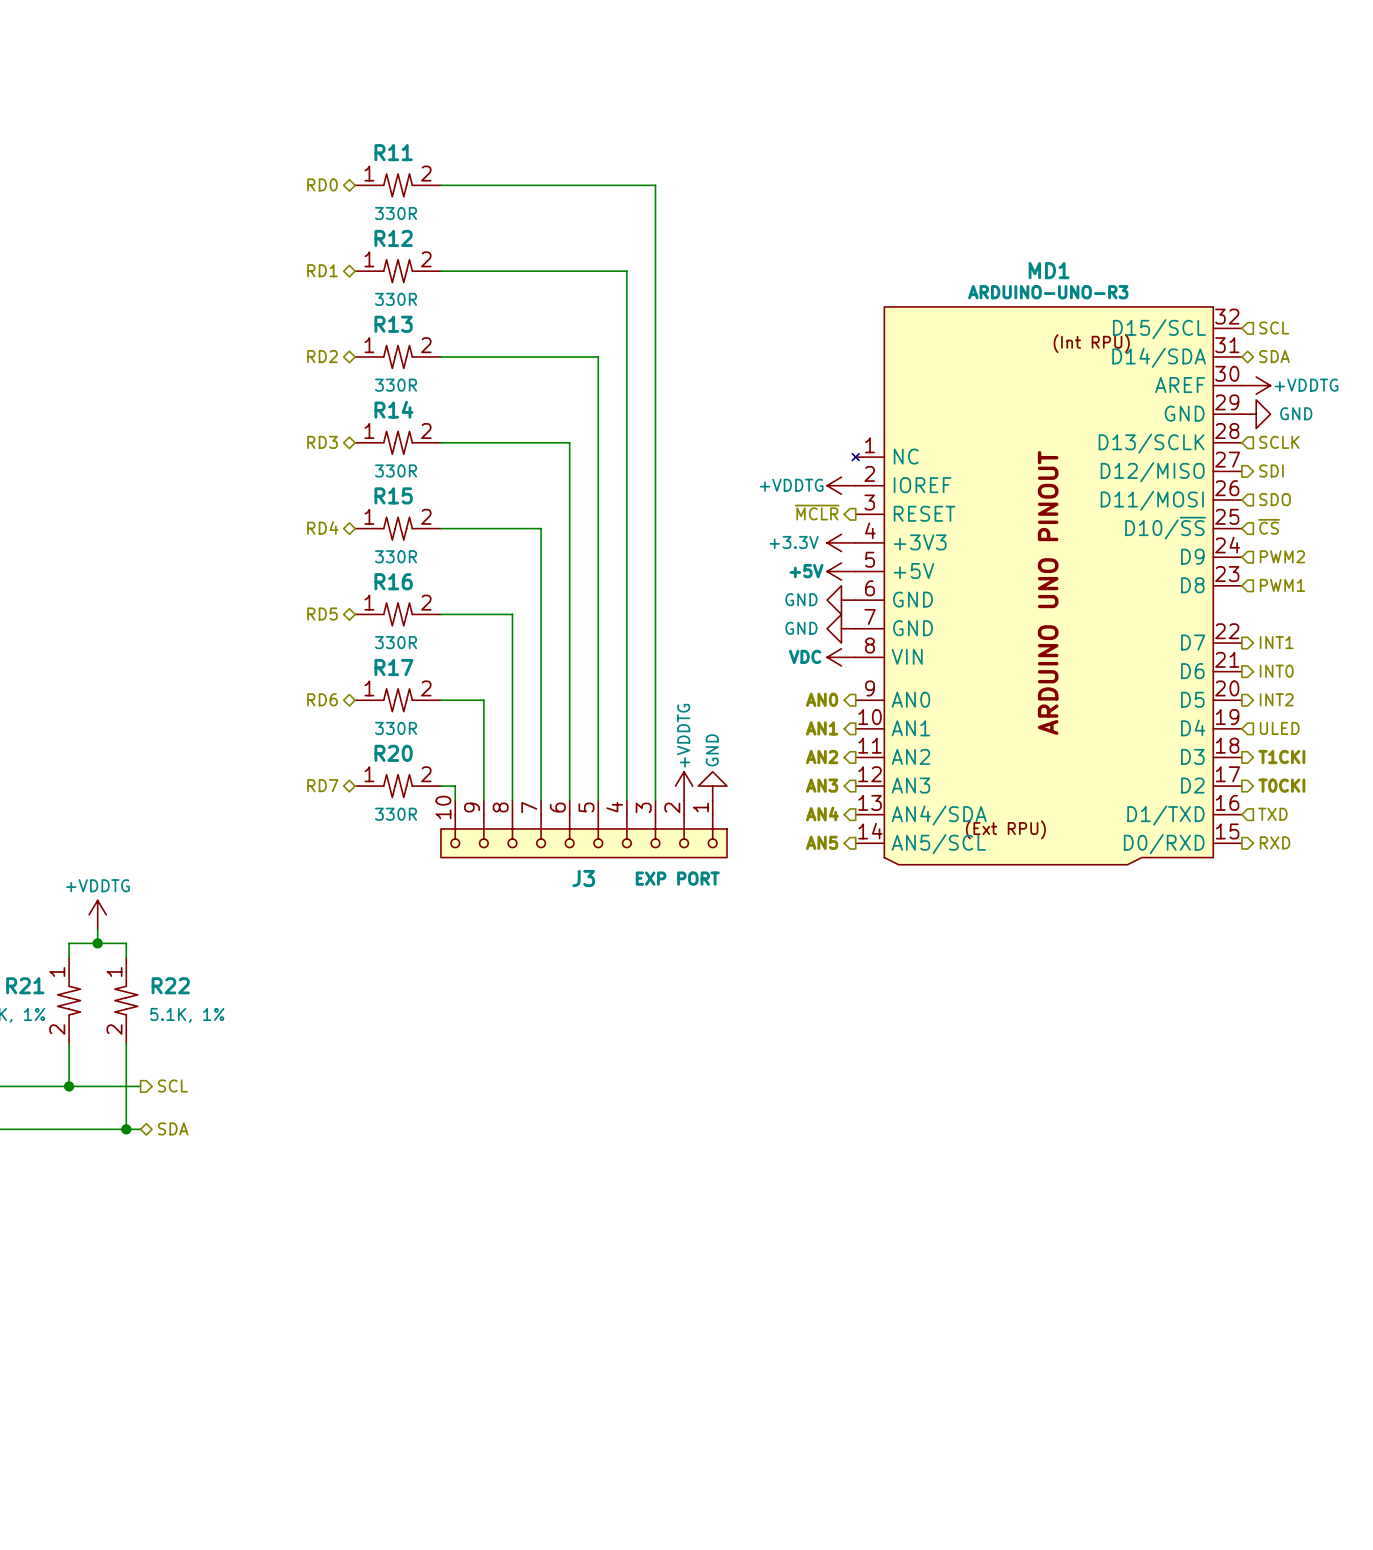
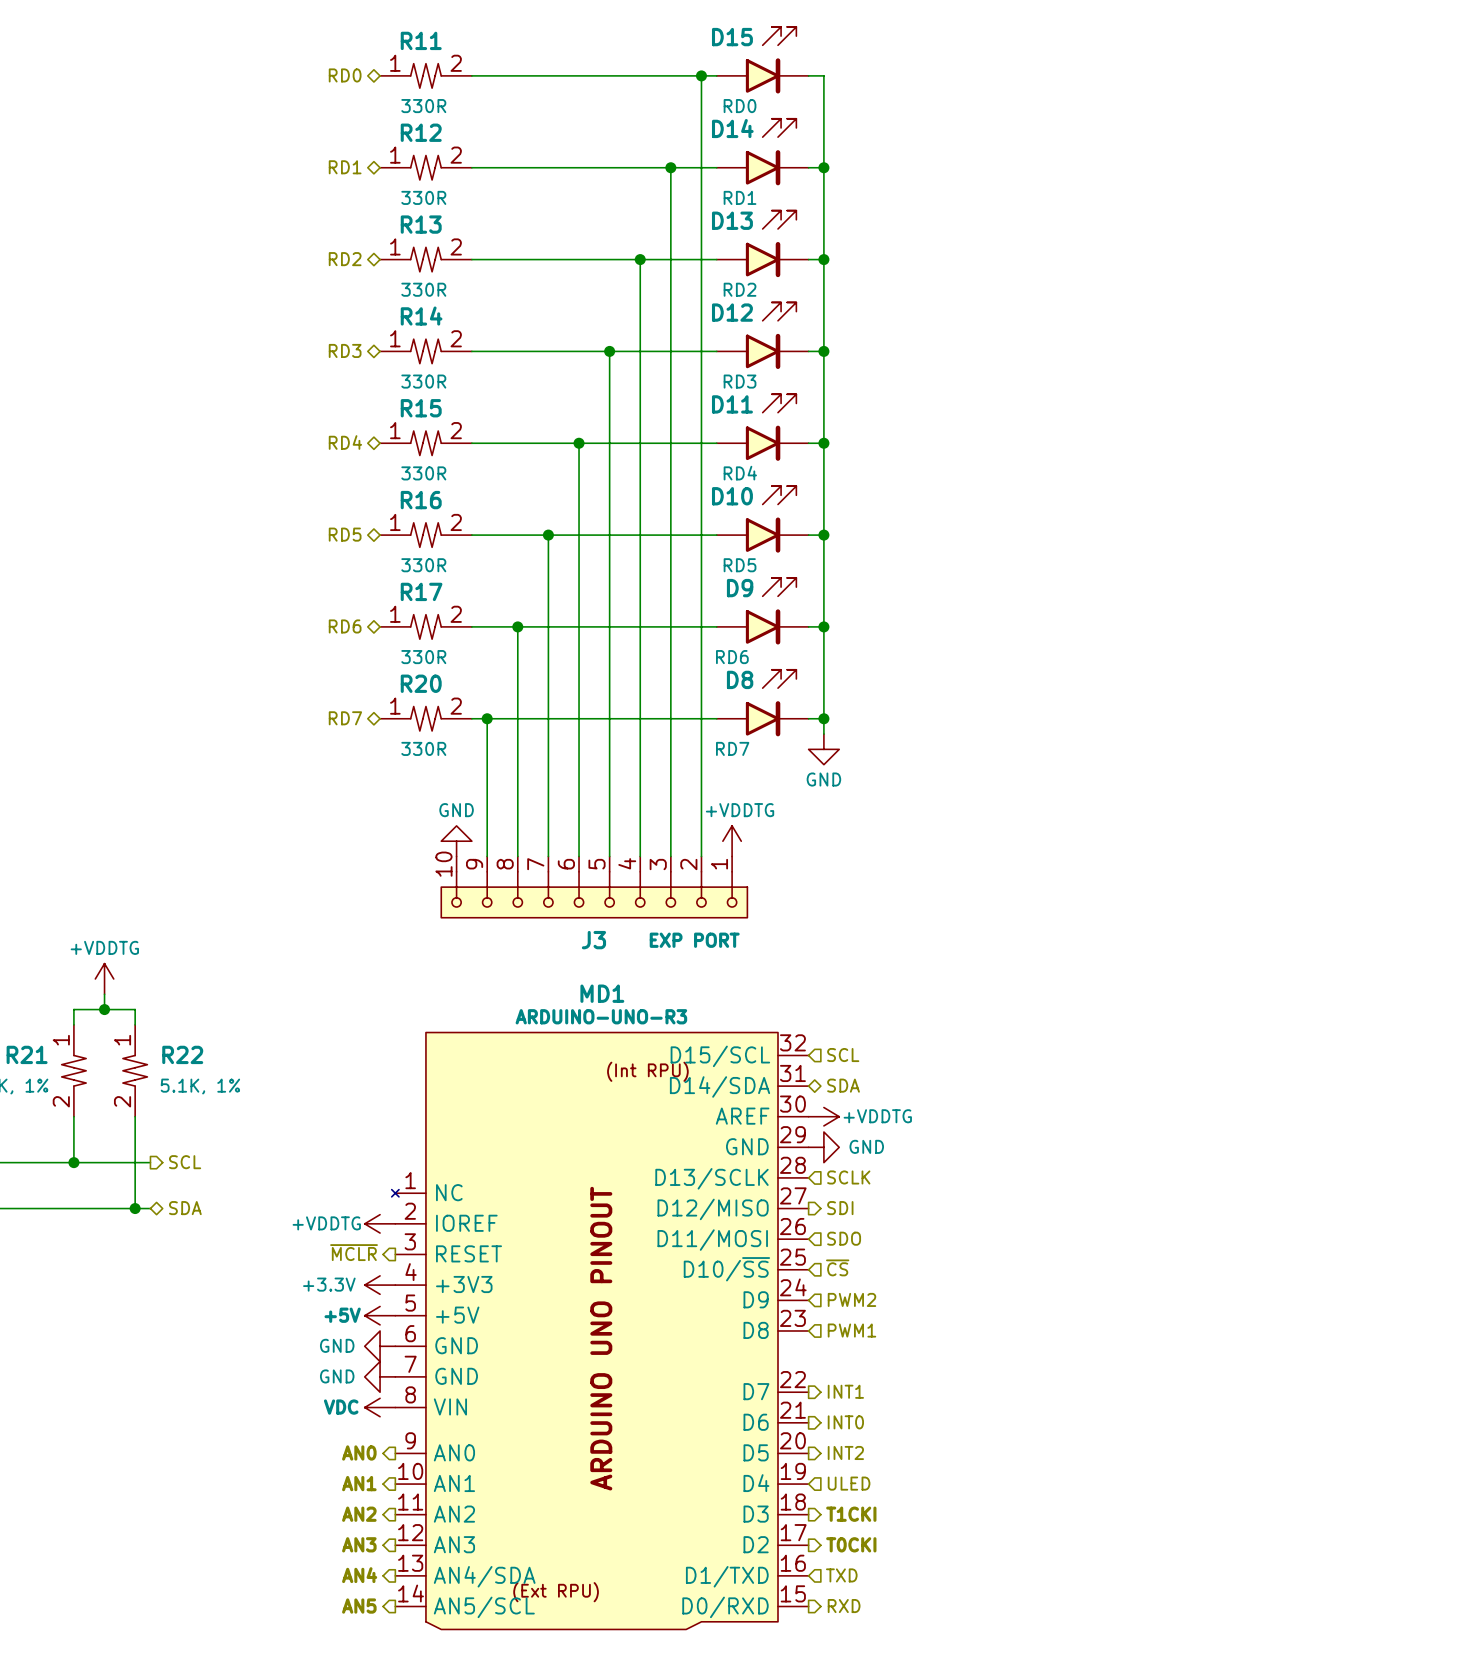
D15: none -> RD0 (762, 60)
wire: none -> (471, 75) (716, 75)
junction: none -> (701, 75)
wire: none -> (808, 75) (823, 75) (823, 734)
D14: none -> RD1 (762, 152)
wire: none -> (471, 167) (716, 167)
junction: none -> (670, 167)
wire: none -> (808, 167) (823, 167)
junction: none -> (823, 167)
hierarchical label position: RD0 (322, 184) -> RD0 (345, 75)
R11 position: (398, 185) -> (425, 75)
wire: (440, 185) (655, 185) -> (701, 75) (701, 198)
D13: none -> RD2 (762, 243)
wire: none -> (471, 259) (716, 259)
junction: none -> (640, 259)
wire: none -> (808, 259) (823, 259)
junction: none -> (823, 259)
hierarchical label position: RD1 (322, 270) -> RD1 (345, 167)
R12 position: (398, 271) -> (425, 167)
wire: (440, 271) (626, 271) -> (670, 167) (670, 290)
D12: none -> RD3 (762, 335)
hierarchical label: SCL (1274, 327) -> none
wire: none -> (471, 351) (716, 351)
junction: none -> (609, 351)
wire: none -> (808, 351) (823, 351)
junction: none -> (823, 351)
hierarchical label position: RD2 (322, 356) -> RD2 (345, 259)
R13 position: (398, 356) -> (425, 259)
wire: (440, 356) (598, 356) -> (640, 259) (640, 382)
hierarchical label: SDA (1274, 356) -> none
power symbol: +VDDTG (1256, 385) -> none
D11: none -> RD4 (762, 427)
wire: none -> (471, 443) (716, 443)
junction: none -> (579, 443)
wire: none -> (808, 443) (823, 443)
junction: none -> (823, 443)
power symbol: GND (1256, 414) -> none
hierarchical label position: RD3 (322, 442) -> RD3 (345, 350)
R14 position: (398, 442) -> (425, 351)
wire: (440, 442) (569, 442) -> (609, 351) (609, 473)
hierarchical label: SCLK (1279, 442) -> none
hierarchical label: SDI (1271, 470) -> none
D10: none -> RD5 (762, 519)
power symbol: +VDDTG (841, 485) -> none
hierarchical label: SDO (1275, 499) -> none
wire: none -> (471, 535) (716, 535)
junction: none -> (548, 535)
wire: none -> (808, 535) (823, 535)
junction: none -> (823, 535)
hierarchical label: ~{MCLR} (817, 512) -> none
hierarchical label: ~{CS} (1269, 526) -> none
hierarchical label position: RD4 (322, 527) -> RD4 (345, 442)
R15 position: (398, 528) -> (425, 443)
wire: (440, 528) (541, 528) -> (579, 443) (579, 565)
power symbol: +3.3V (841, 542) -> none
hierarchical label: PWM2 (1282, 556) -> none
D9: none -> RD6 (762, 611)
power symbol: +5V (841, 571) -> none
wire: none -> (471, 626) (716, 626)
junction: none -> (517, 626)
wire: none -> (808, 626) (823, 626)
junction: none -> (823, 626)
MD1 position: (1047, 585) -> (600, 1330)
hierarchical label: PWM1 (1282, 585) -> none
power symbol: GND (841, 600) -> none
hierarchical label position: RD5 (322, 614) -> RD5 (345, 534)
R16 position: (398, 614) -> (425, 535)
wire: (440, 614) (512, 614) -> (548, 535) (548, 657)
power symbol: GND (841, 628) -> none
hierarchical label: INT1 (1276, 642) -> none
D8: none -> RD7 (762, 703)
power symbol: VDC (841, 657) -> none
wire: none -> (471, 718) (716, 718)
junction: none -> (487, 718)
wire: none -> (808, 718) (823, 718)
junction: none -> (823, 718)
hierarchical label: INT0 (1276, 671) -> none
hierarchical label position: RD6 (322, 699) -> RD6 (345, 626)
hierarchical label: AN0 (822, 699) -> none
hierarchical label: INT2 (1276, 699) -> none
R17 position: (398, 700) -> (425, 626)
wire: (440, 700) (483, 700) -> (517, 626) (517, 749)
power symbol: none -> GND (823, 749)
hierarchical label: AN1 (822, 728) -> none
hierarchical label: ULED (1279, 728) -> none
power symbol text rotation: 0° (683, 735) -> 90° clockwise (740, 810)
hierarchical label: AN2 (822, 757) -> none
hierarchical label: T1CKI (1281, 757) -> none
hierarchical label position: RD7 (322, 785) -> RD7 (345, 718)
hierarchical label: AN3 (822, 785) -> none
hierarchical label: T0CKI (1281, 785) -> none
R20 position: (398, 786) -> (425, 718)
power symbol: none -> GND (456, 841)
wire: (440, 786) (455, 786) -> (487, 718) (487, 841)
power symbol: GND (712, 786) -> none
hierarchical label: AN4 (822, 813) -> none
hierarchical label: TXD (1272, 814) -> none
J3 position: (583, 828) -> (594, 887)
hierarchical label: AN5 (822, 842) -> none
hierarchical label: RXD (1275, 842) -> none
hierarchical label: none -> SCL (843, 1055)
hierarchical label: none -> SDA (843, 1085)
power symbol: none -> +VDDTG (823, 1116)
power symbol: none -> GND (823, 1147)
hierarchical label: none -> SCLK (848, 1177)
hierarchical label: none -> SDI (840, 1208)
power symbol: none -> +VDDTG (380, 1223)
hierarchical label: none -> SDO (844, 1238)
hierarchical label: none -> ~{MCLR} (354, 1252)
hierarchical label: none -> ~{CS} (837, 1267)
power symbol: none -> +3.3V (380, 1285)
hierarchical label: none -> PWM2 (851, 1299)
power symbol: none -> +5V (380, 1315)
hierarchical label: none -> PWM1 (851, 1330)
power symbol: none -> GND (380, 1346)
power symbol: none -> GND (380, 1376)
hierarchical label: none -> INT1 (845, 1391)
power symbol: none -> VDC (380, 1407)
hierarchical label: none -> INT0 (845, 1422)
hierarchical label: none -> AN0 (359, 1452)
hierarchical label: none -> INT2 (845, 1452)
hierarchical label: none -> AN1 (359, 1483)
hierarchical label: none -> ULED (849, 1483)
hierarchical label: none -> AN2 (359, 1514)
hierarchical label: none -> T1CKI (851, 1514)
hierarchical label: none -> AN3 (359, 1544)
hierarchical label: none -> T0CKI (851, 1544)
hierarchical label: none -> AN4 (359, 1575)
hierarchical label: none -> TXD (841, 1575)
hierarchical label: none -> AN5 (359, 1606)
hierarchical label: none -> RXD (844, 1606)

